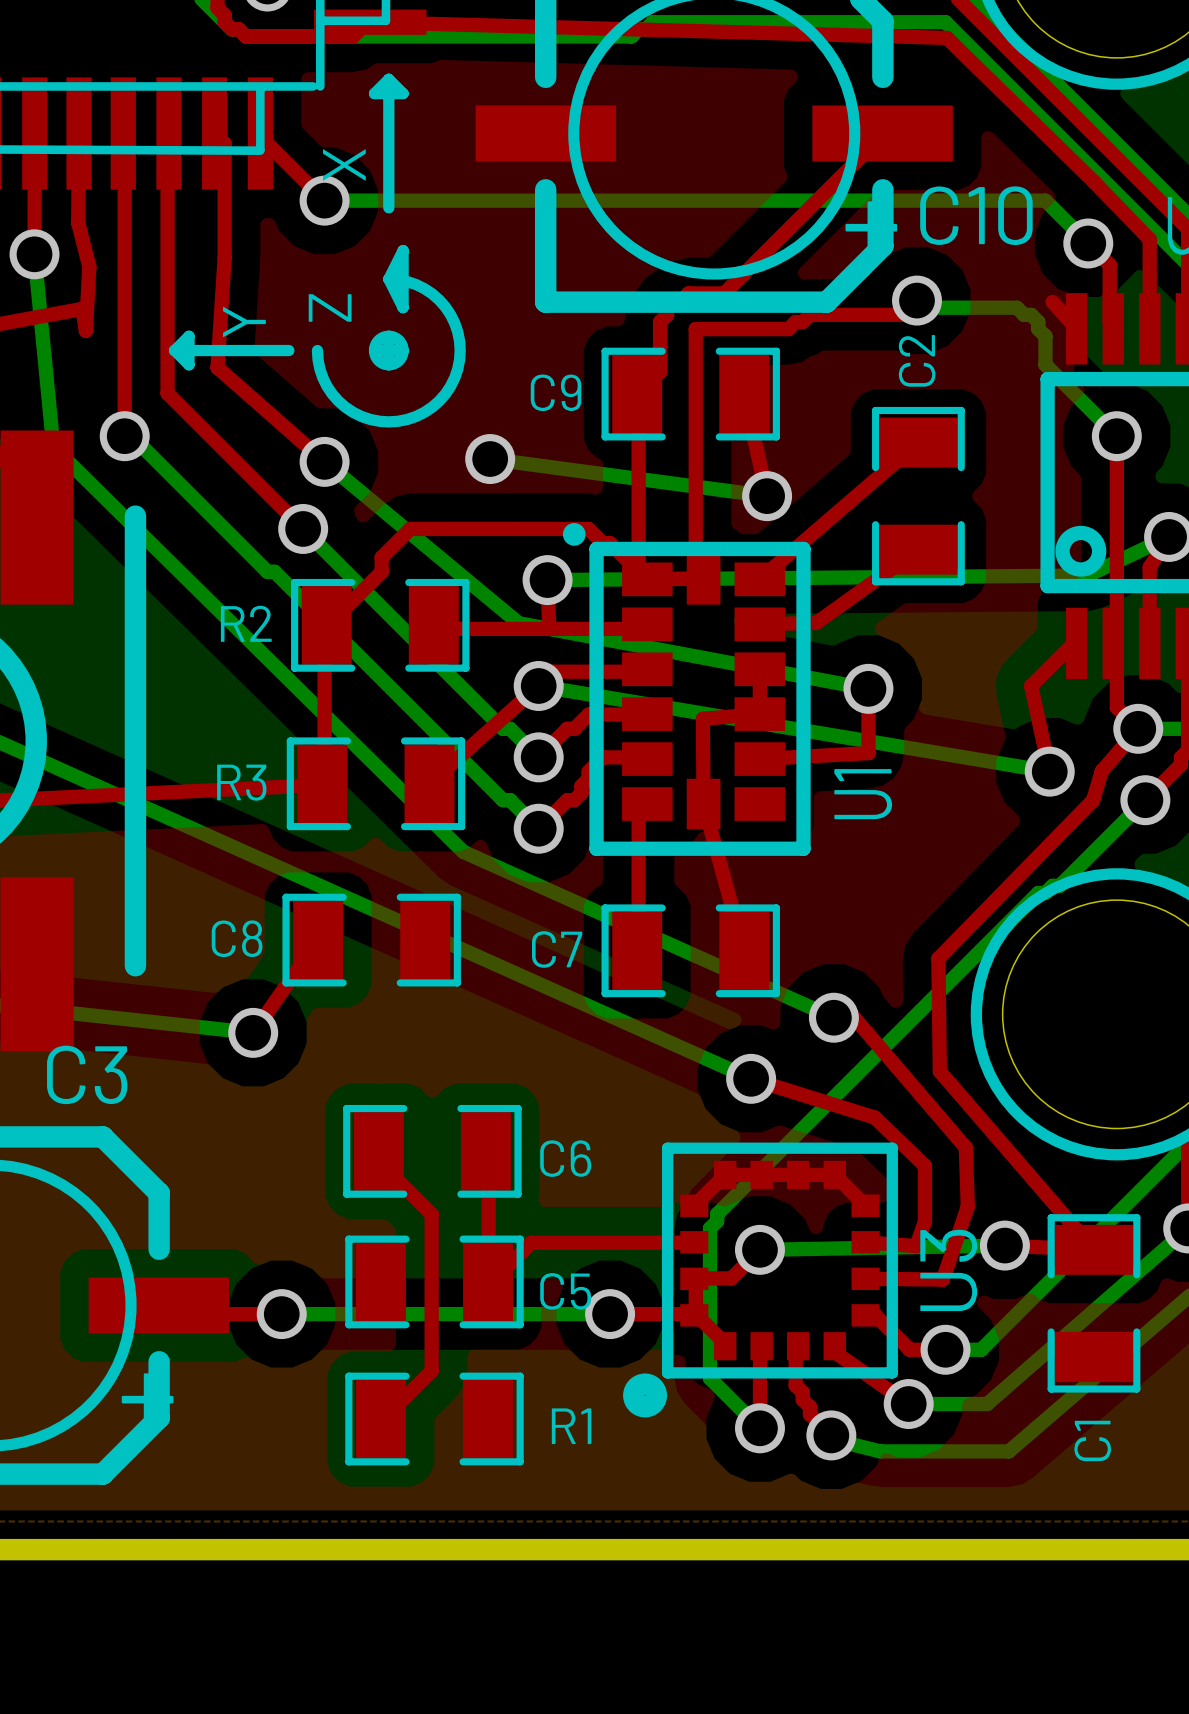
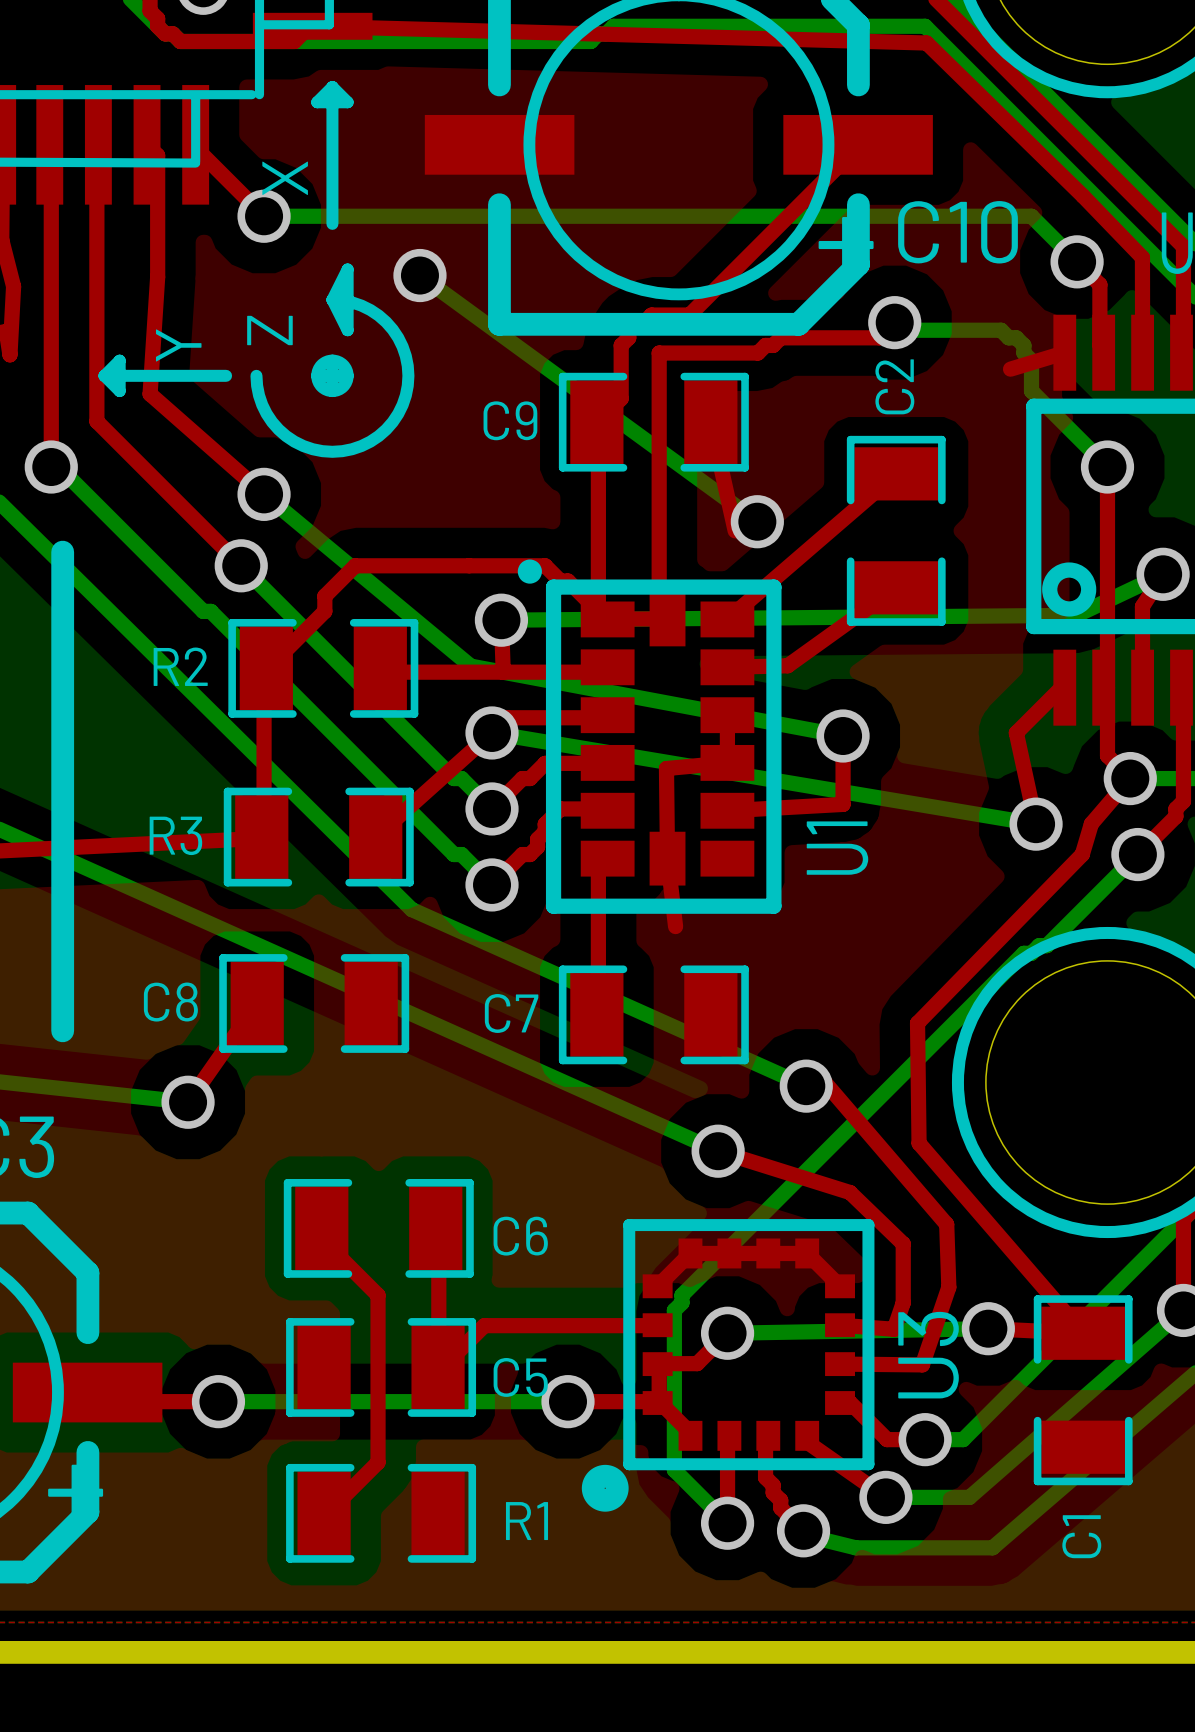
bottom track: none -> (419, 275) (757, 521)
via: none -> (419, 275)
top track: (1052, 302) (1076, 328) -> (1010, 369) (1064, 352)
bottom track: (490, 459) (767, 496) -> none
via: (490, 459) -> none
via position: (767, 496) -> (757, 521)
top track: (759, 714) (702, 718) (703, 804) (744, 950) -> (727, 762) (666, 768) (667, 858) (675, 926)

